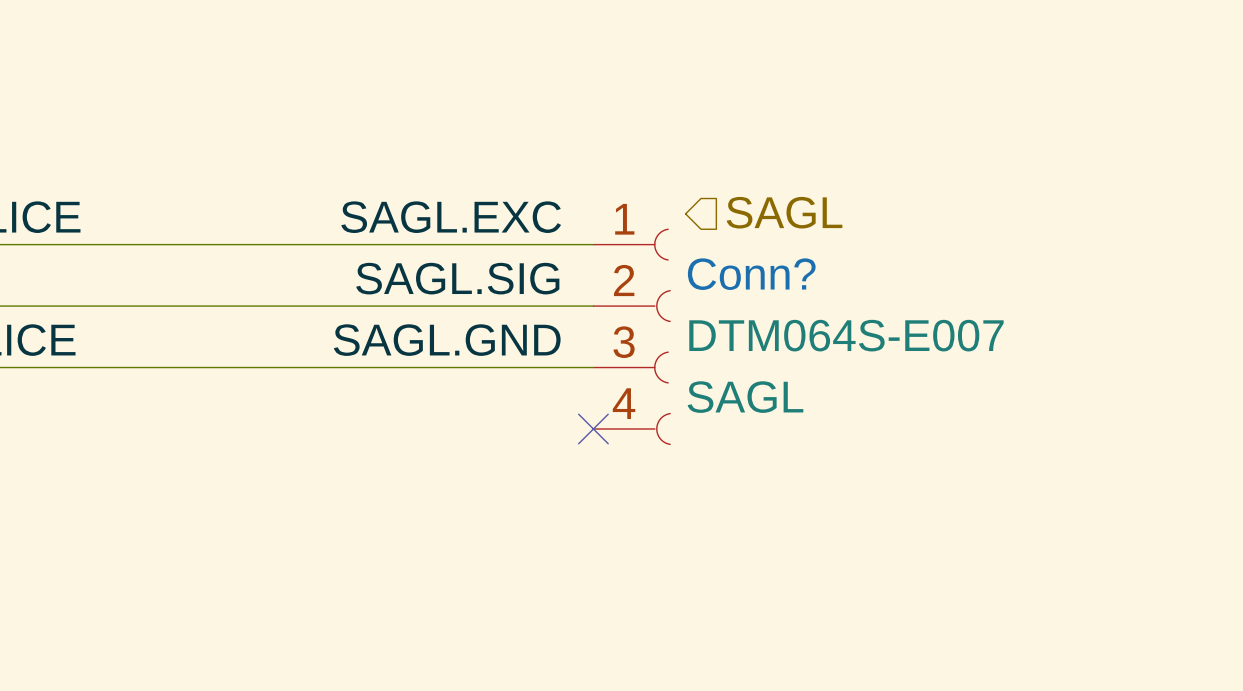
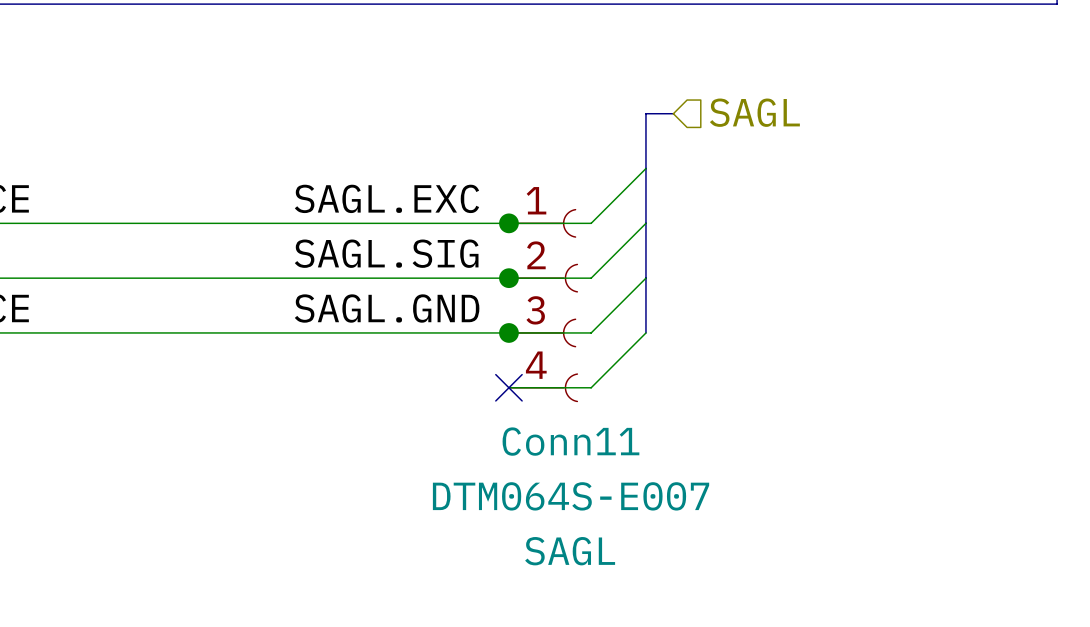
bus: none -> (673, 113) (645, 113) (645, 332)
wire: none -> (645, 168) (591, 223) (508, 223)
hierarchical label position: SAGL (784, 212) -> SAGL (754, 112)
junction: none -> (508, 223)
wire: none -> (645, 223) (591, 278) (508, 278)
Conn? name: Conn? (751, 274) -> Conn11 (570, 441)
junction: none -> (508, 278)
wire: none -> (645, 278) (591, 332) (508, 332)
Conn? text position: DTM064S-E007 (846, 335) -> DTM064S-E007 (571, 496)
junction: none -> (508, 332)
wire: none -> (645, 332) (591, 387) (508, 387)
Conn? text position: SAGL (745, 397) -> SAGL (570, 551)

